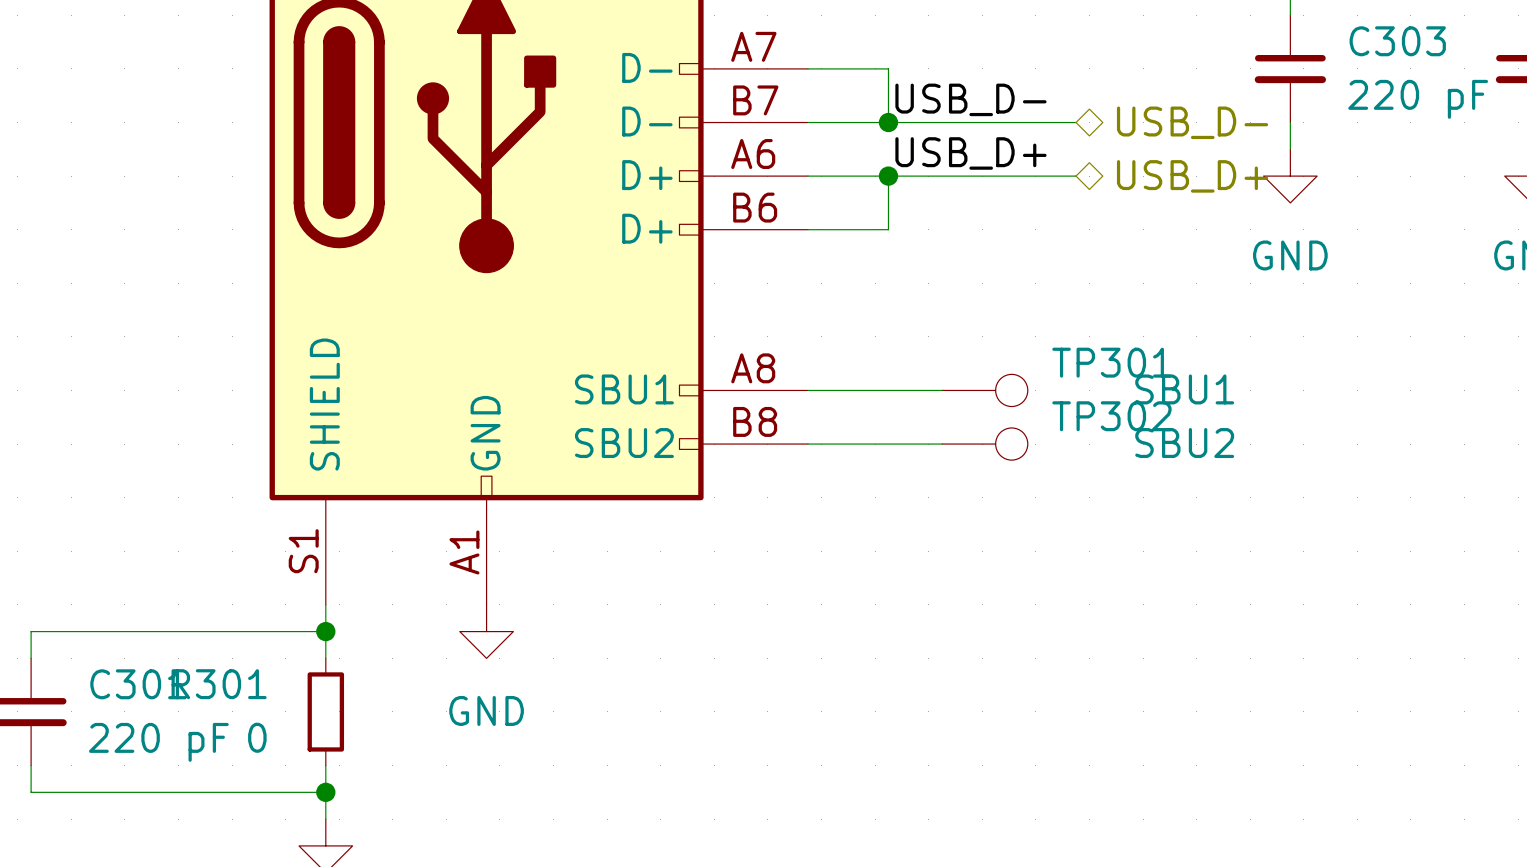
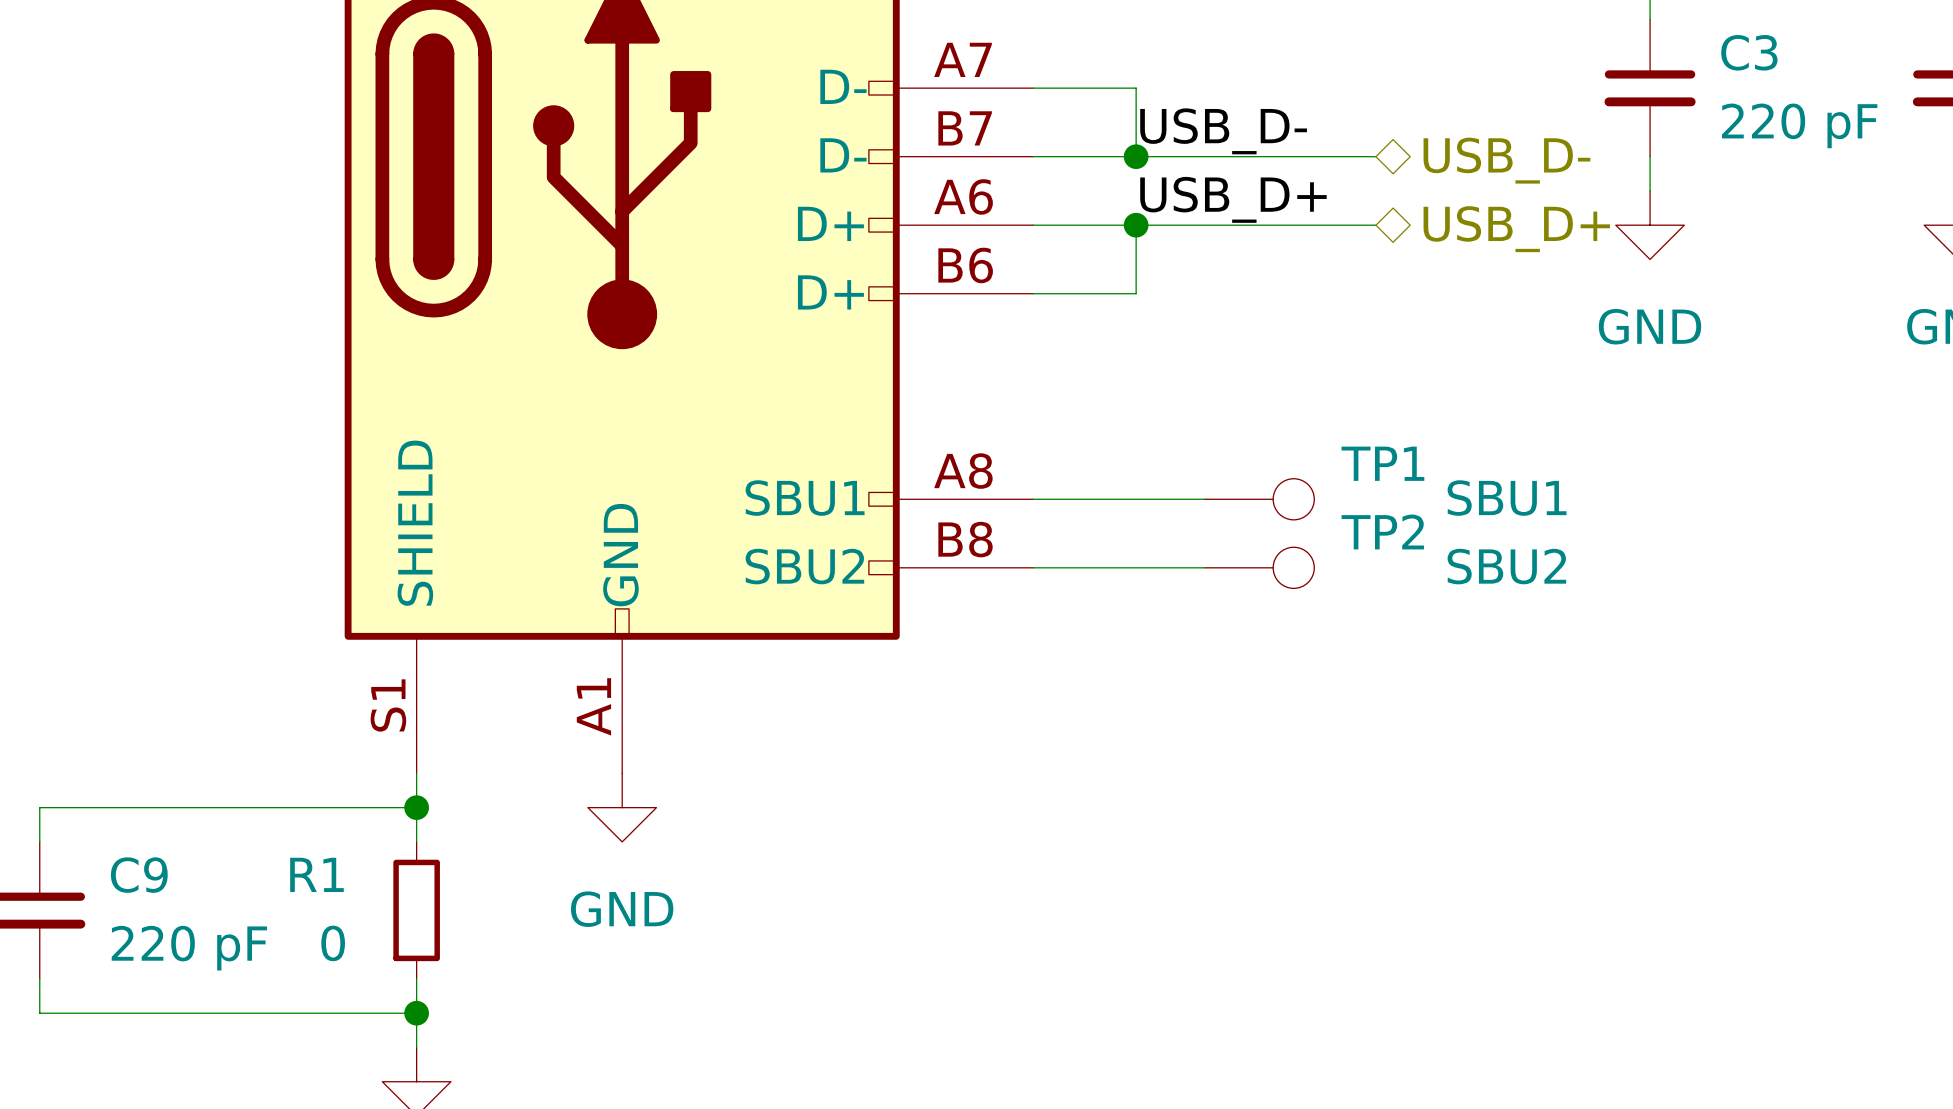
C303 name: C303 (1397, 41) -> C3 (1749, 52)
TP301 name: TP301 (1111, 362) -> TP1 (1382, 463)
TP302 name: TP302 (1111, 416) -> TP2 (1382, 531)
C301 name: C301 (138, 684) -> C9 (139, 875)
R301 name: R301 (219, 684) -> R1 (316, 874)

